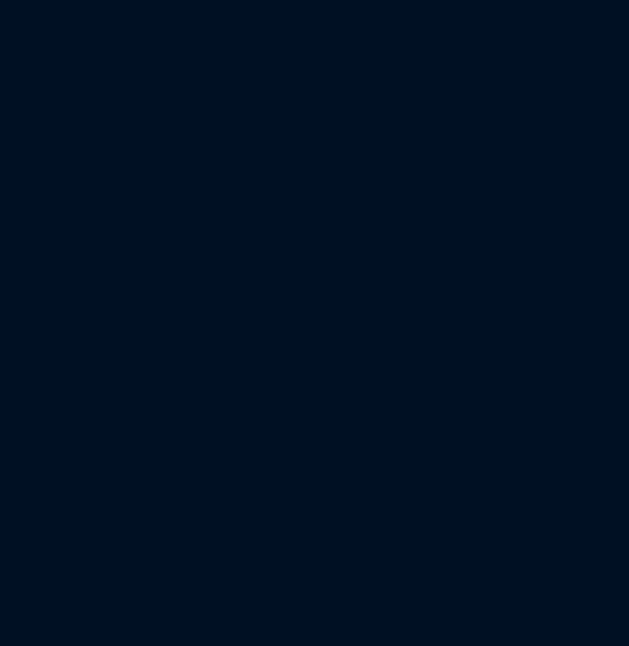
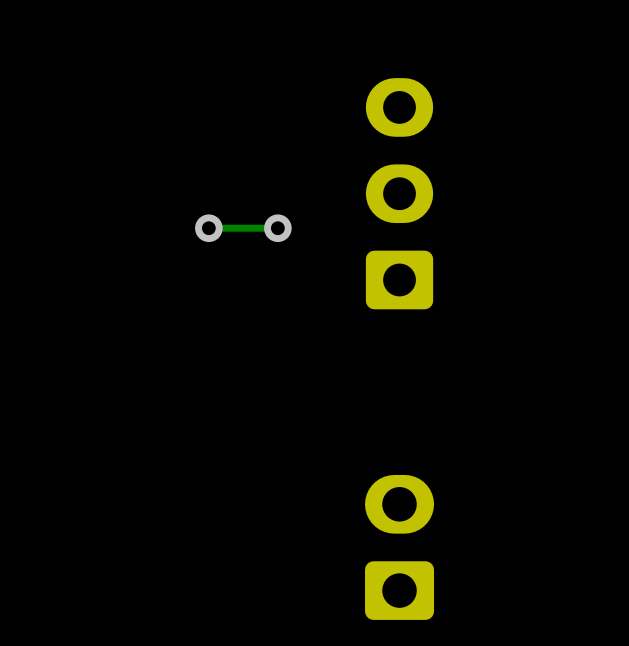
part: none -> (399, 193)
via: none -> (208, 228)
track: none -> (277, 228) (208, 228)
via: none -> (277, 228)
part: none -> (399, 547)

